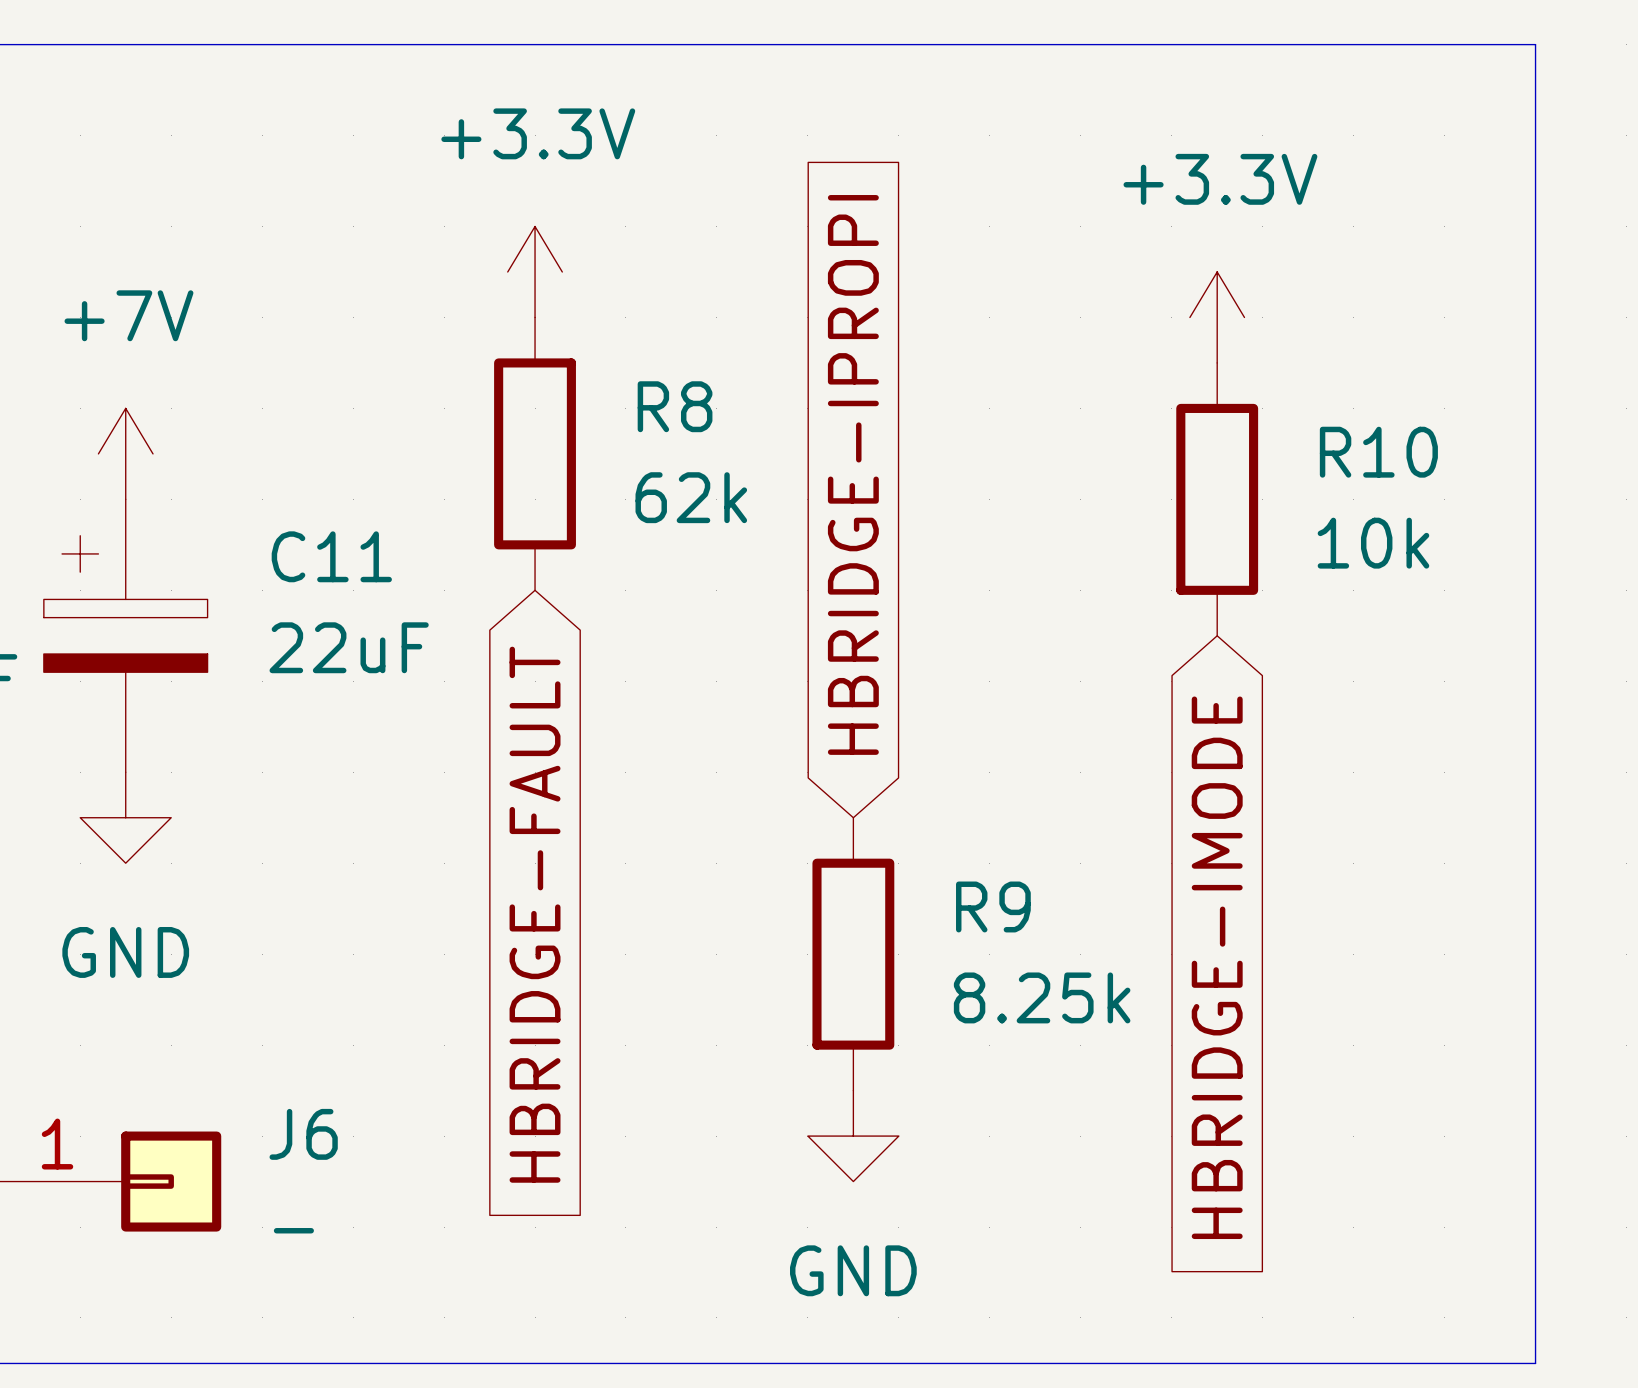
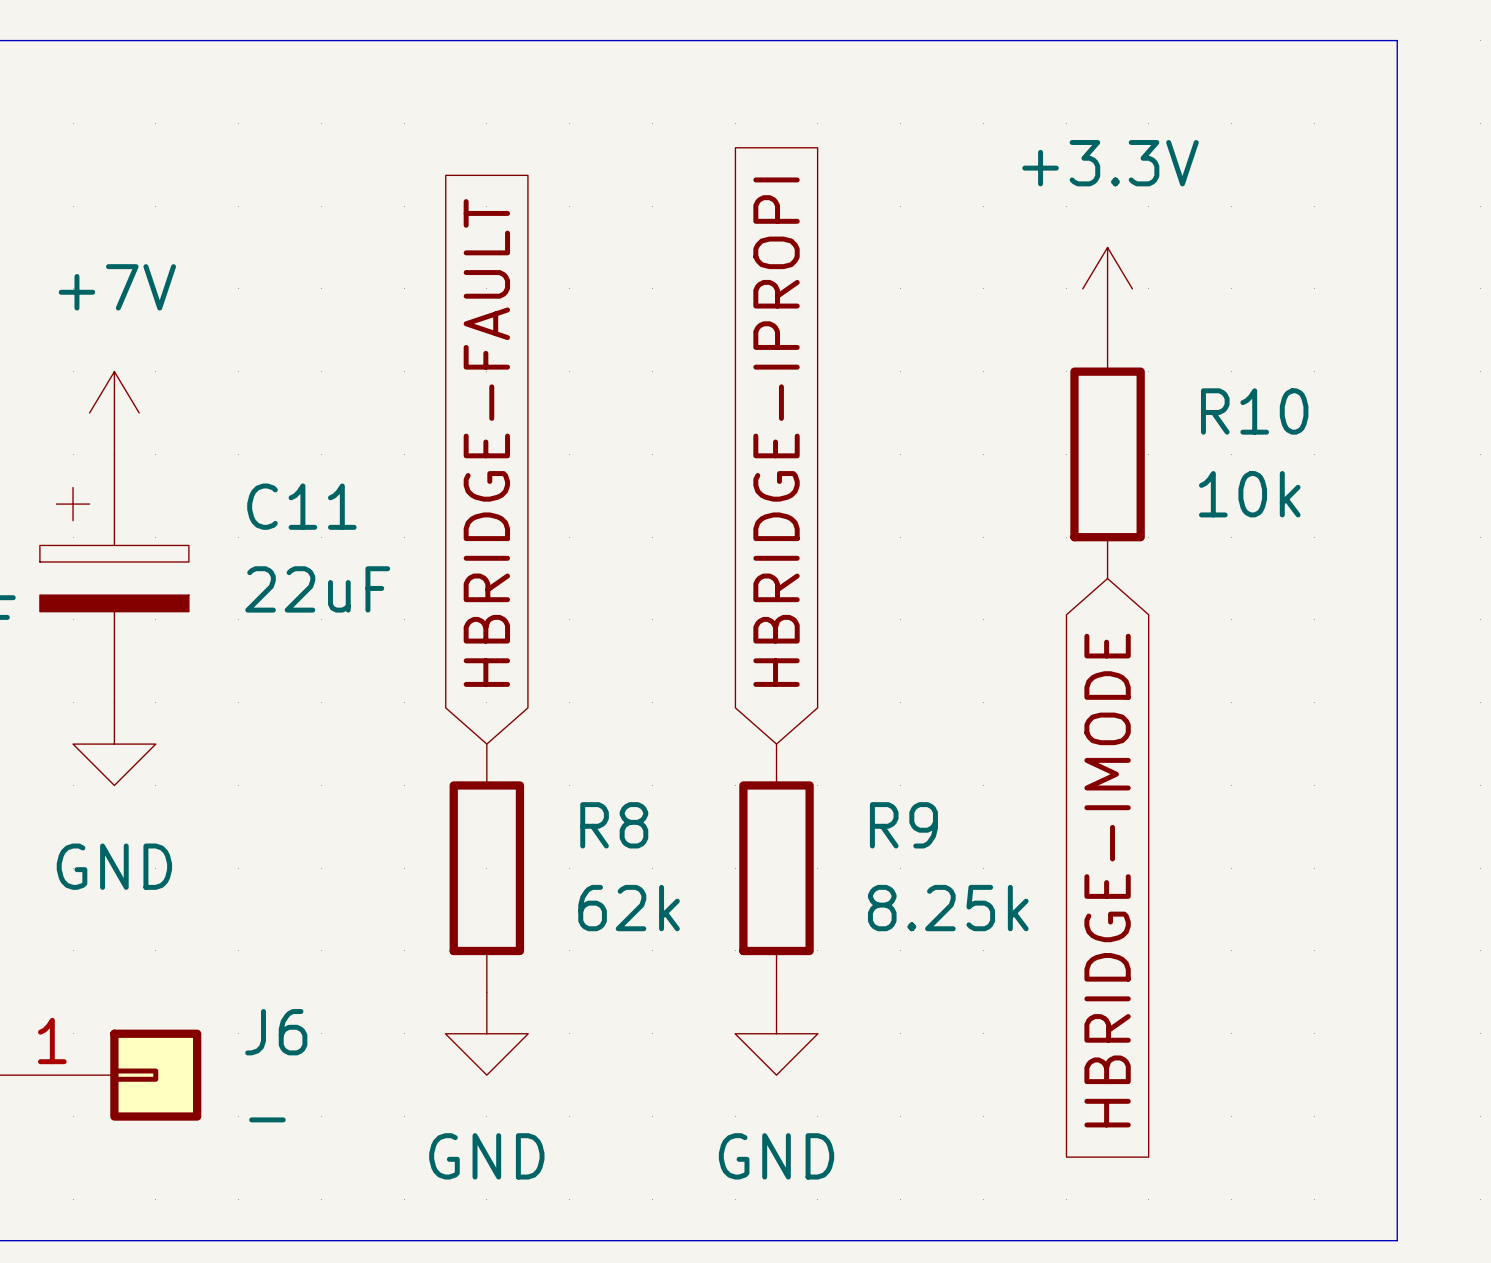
power symbol: +3.3V (535, 271) -> none
R8 position: (535, 453) -> (486, 868)
global label rotation: 0° (535, 914) -> 180° (486, 443)
power symbol: none -> GND (486, 1033)

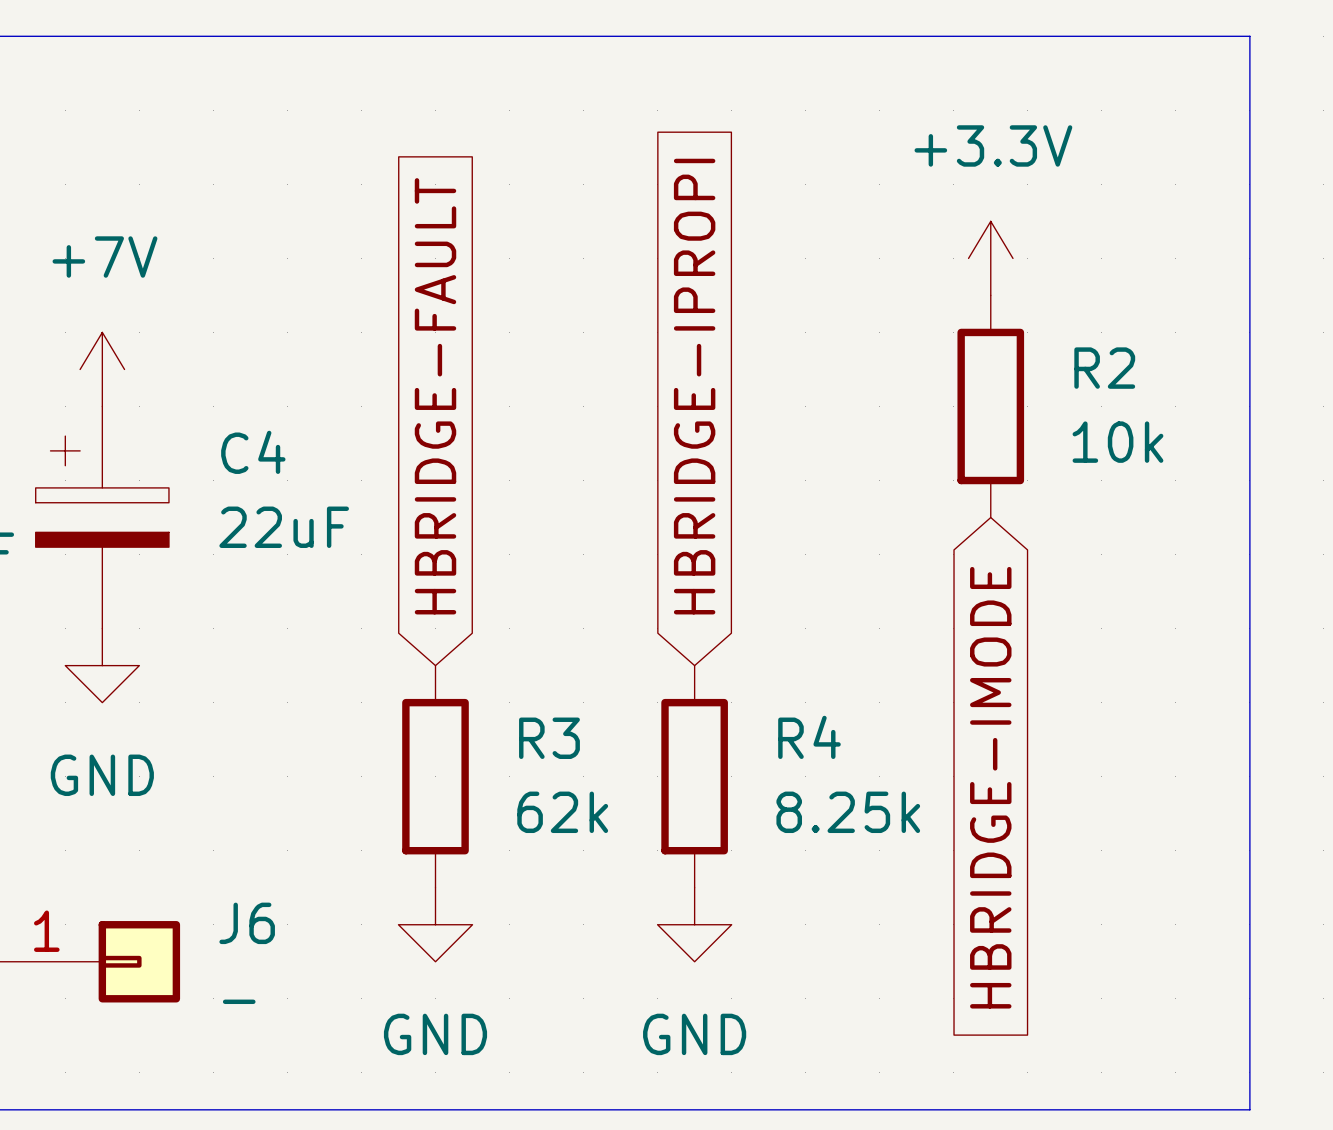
R10 name: R10 (1254, 411) -> R2 (1104, 368)
C11 name: C11 (301, 506) -> C4 (253, 452)
R8 name: R8 (614, 825) -> R3 (549, 738)
R9 name: R9 (903, 825) -> R4 (809, 737)

